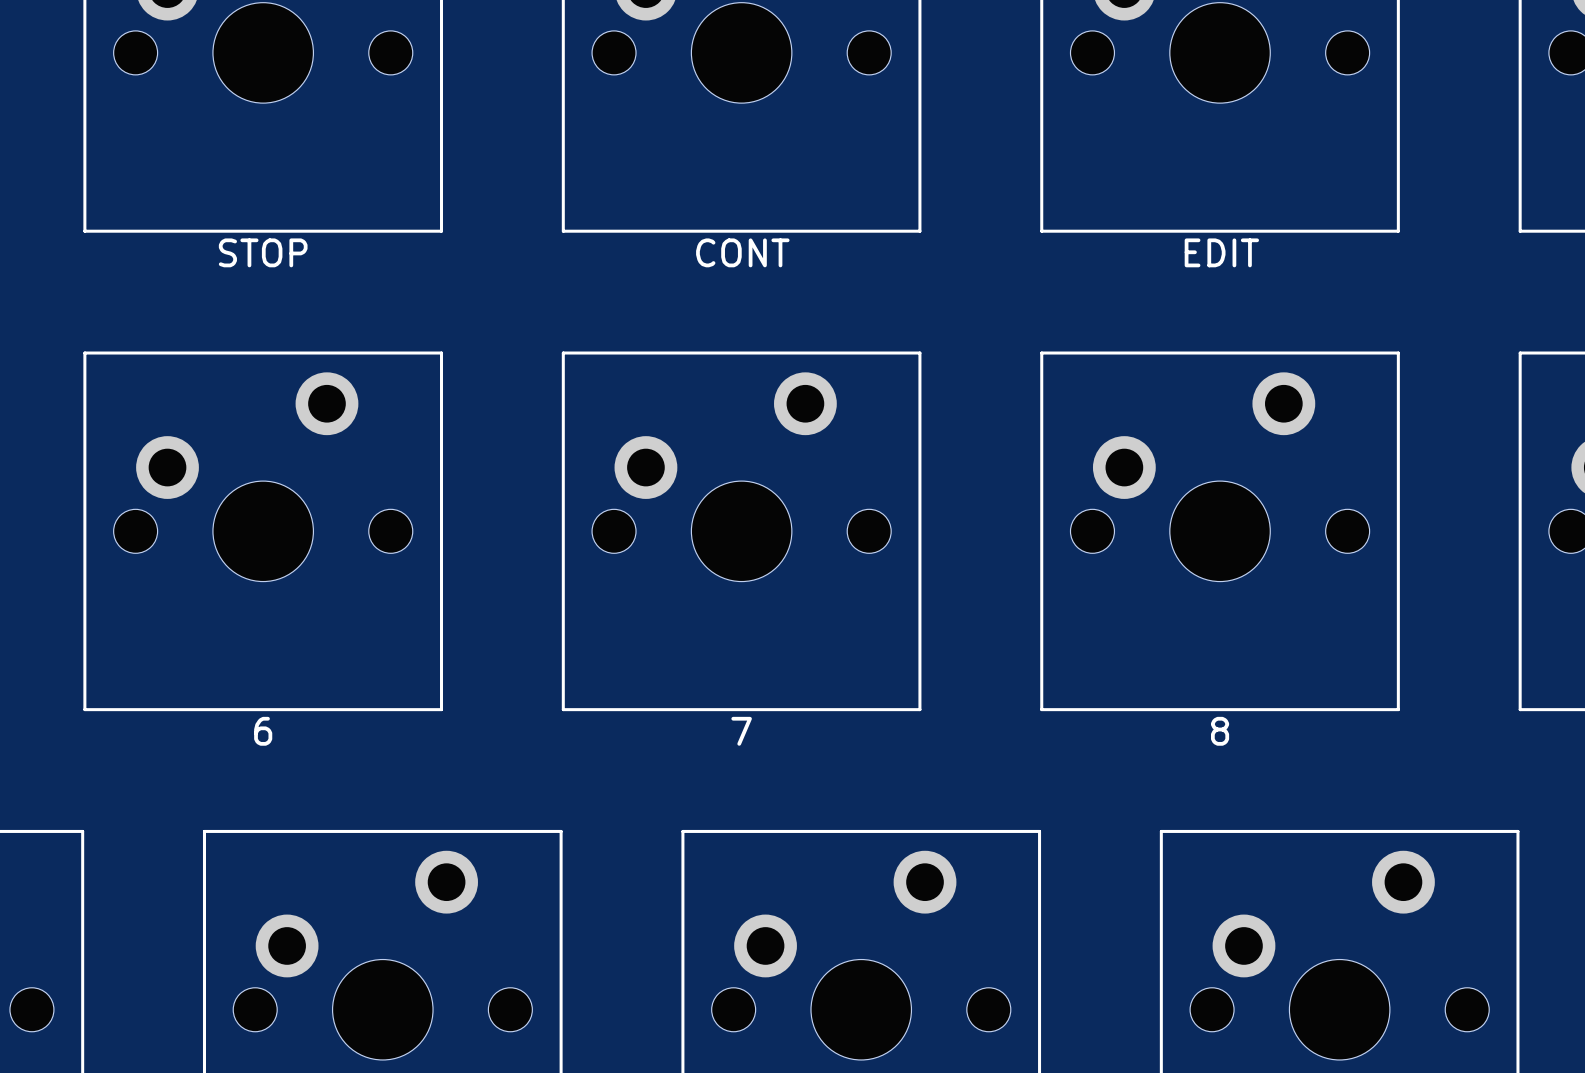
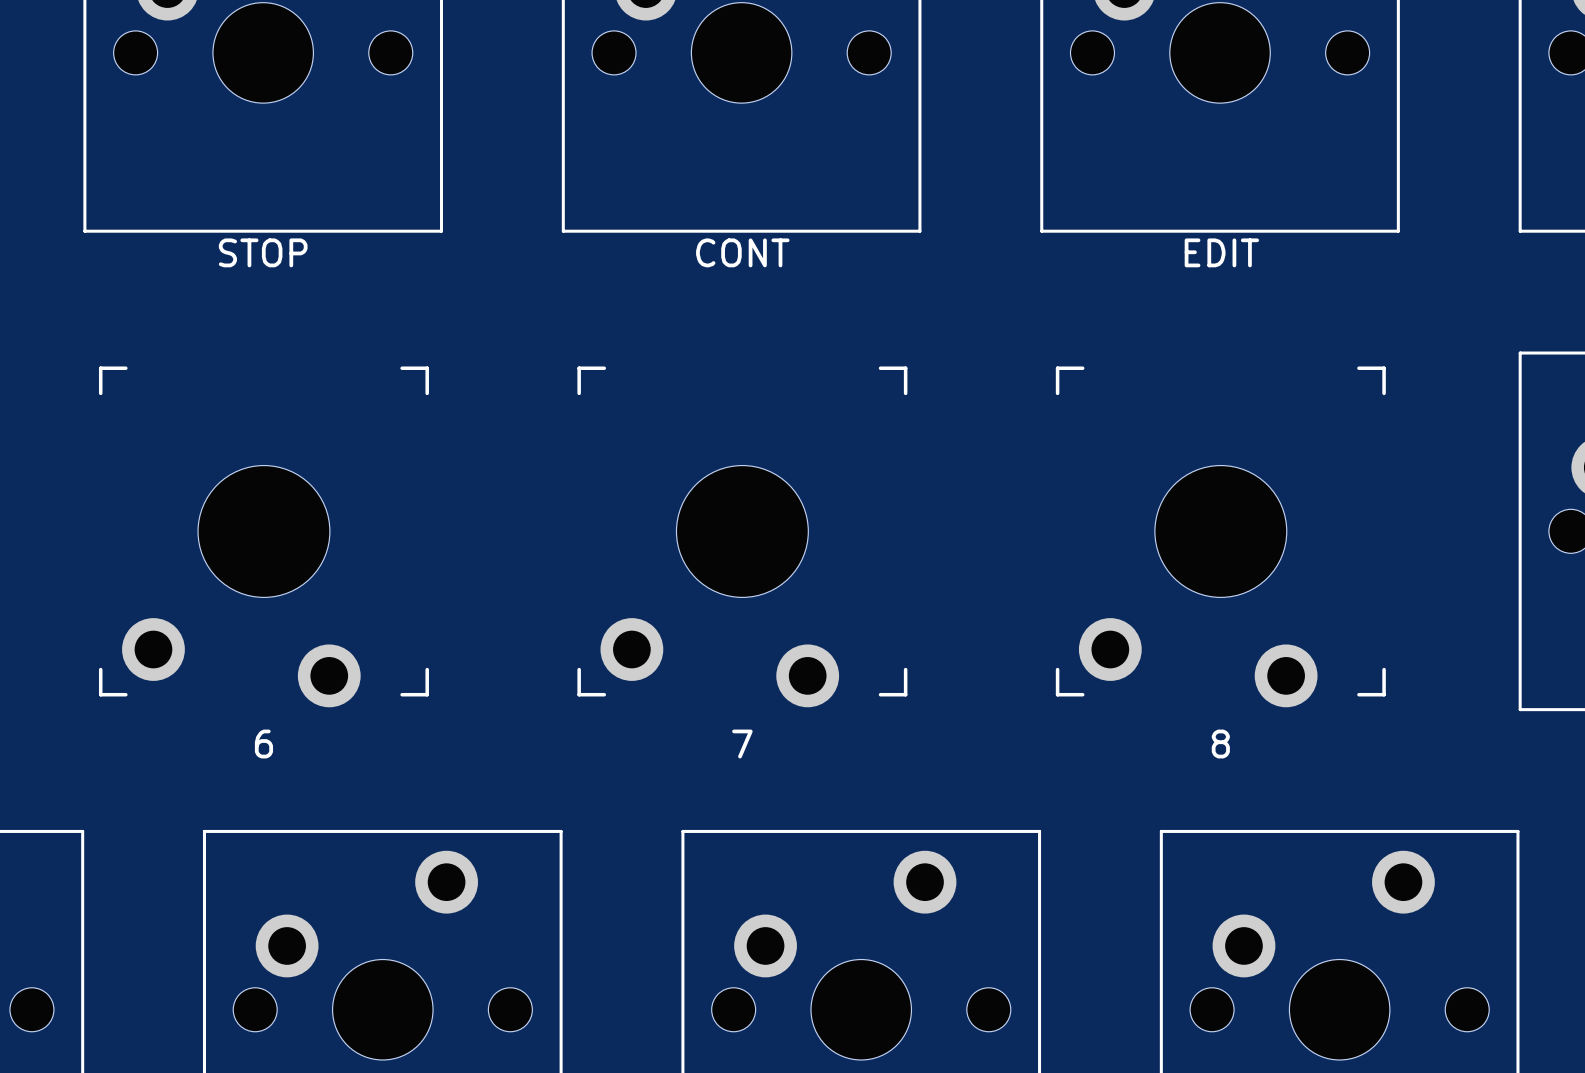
part footprint: [83, 351, 444, 712] -> [98, 366, 429, 708]
part footprint: [561, 351, 922, 712] -> [577, 366, 908, 708]
part footprint: [1040, 351, 1400, 712] -> [1055, 366, 1386, 708]

